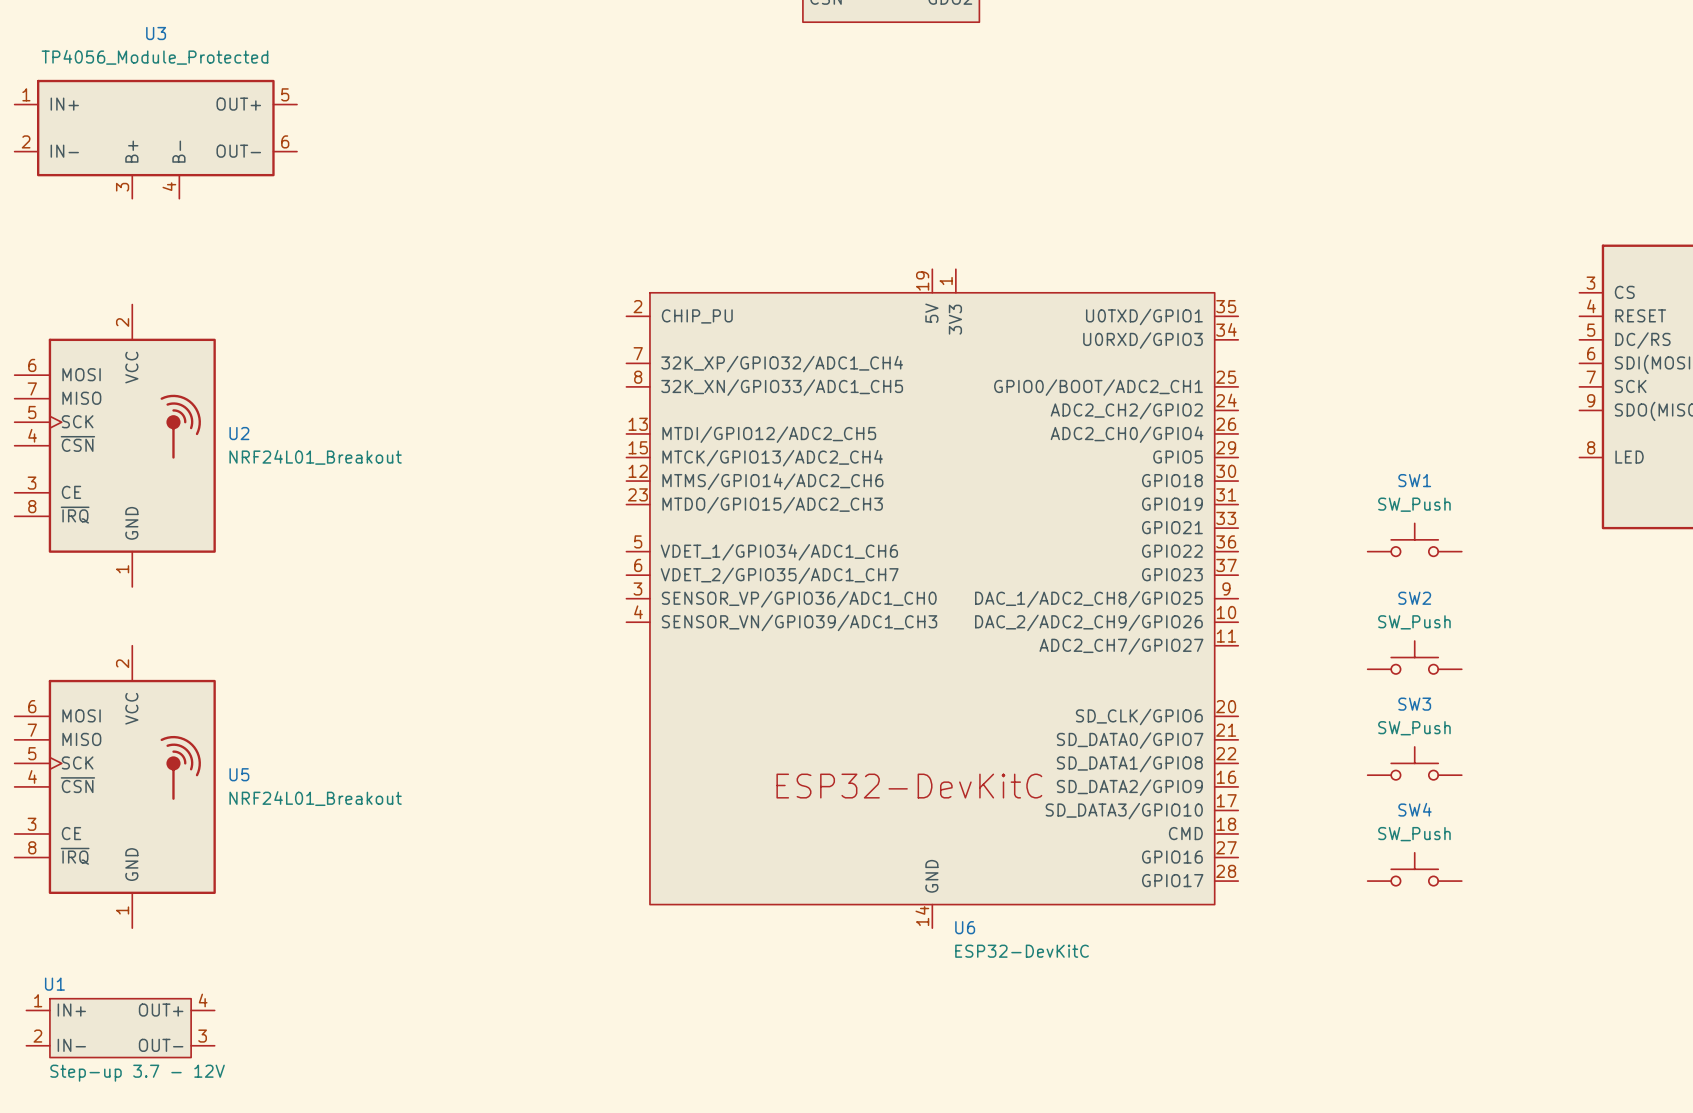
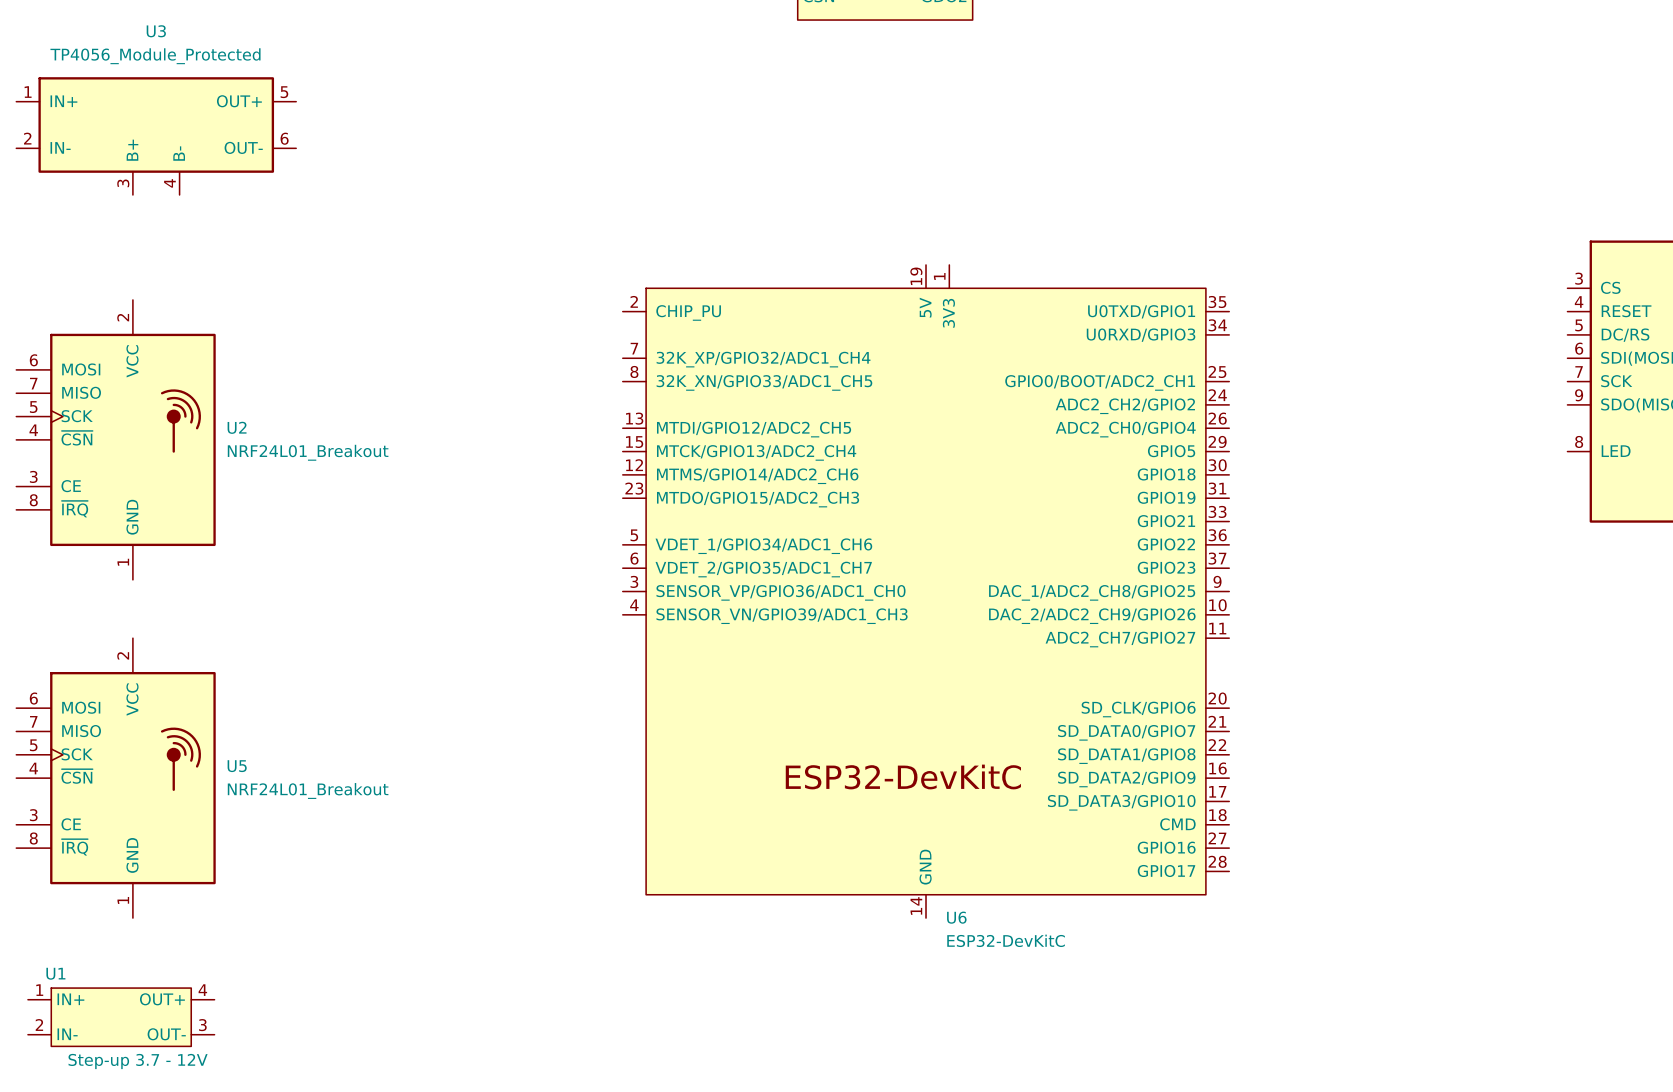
SW1: SW_Push (1414, 539) -> none
SW2: SW_Push (1414, 657) -> none
SW3: SW_Push (1414, 763) -> none
SW4: SW_Push (1414, 869) -> none

